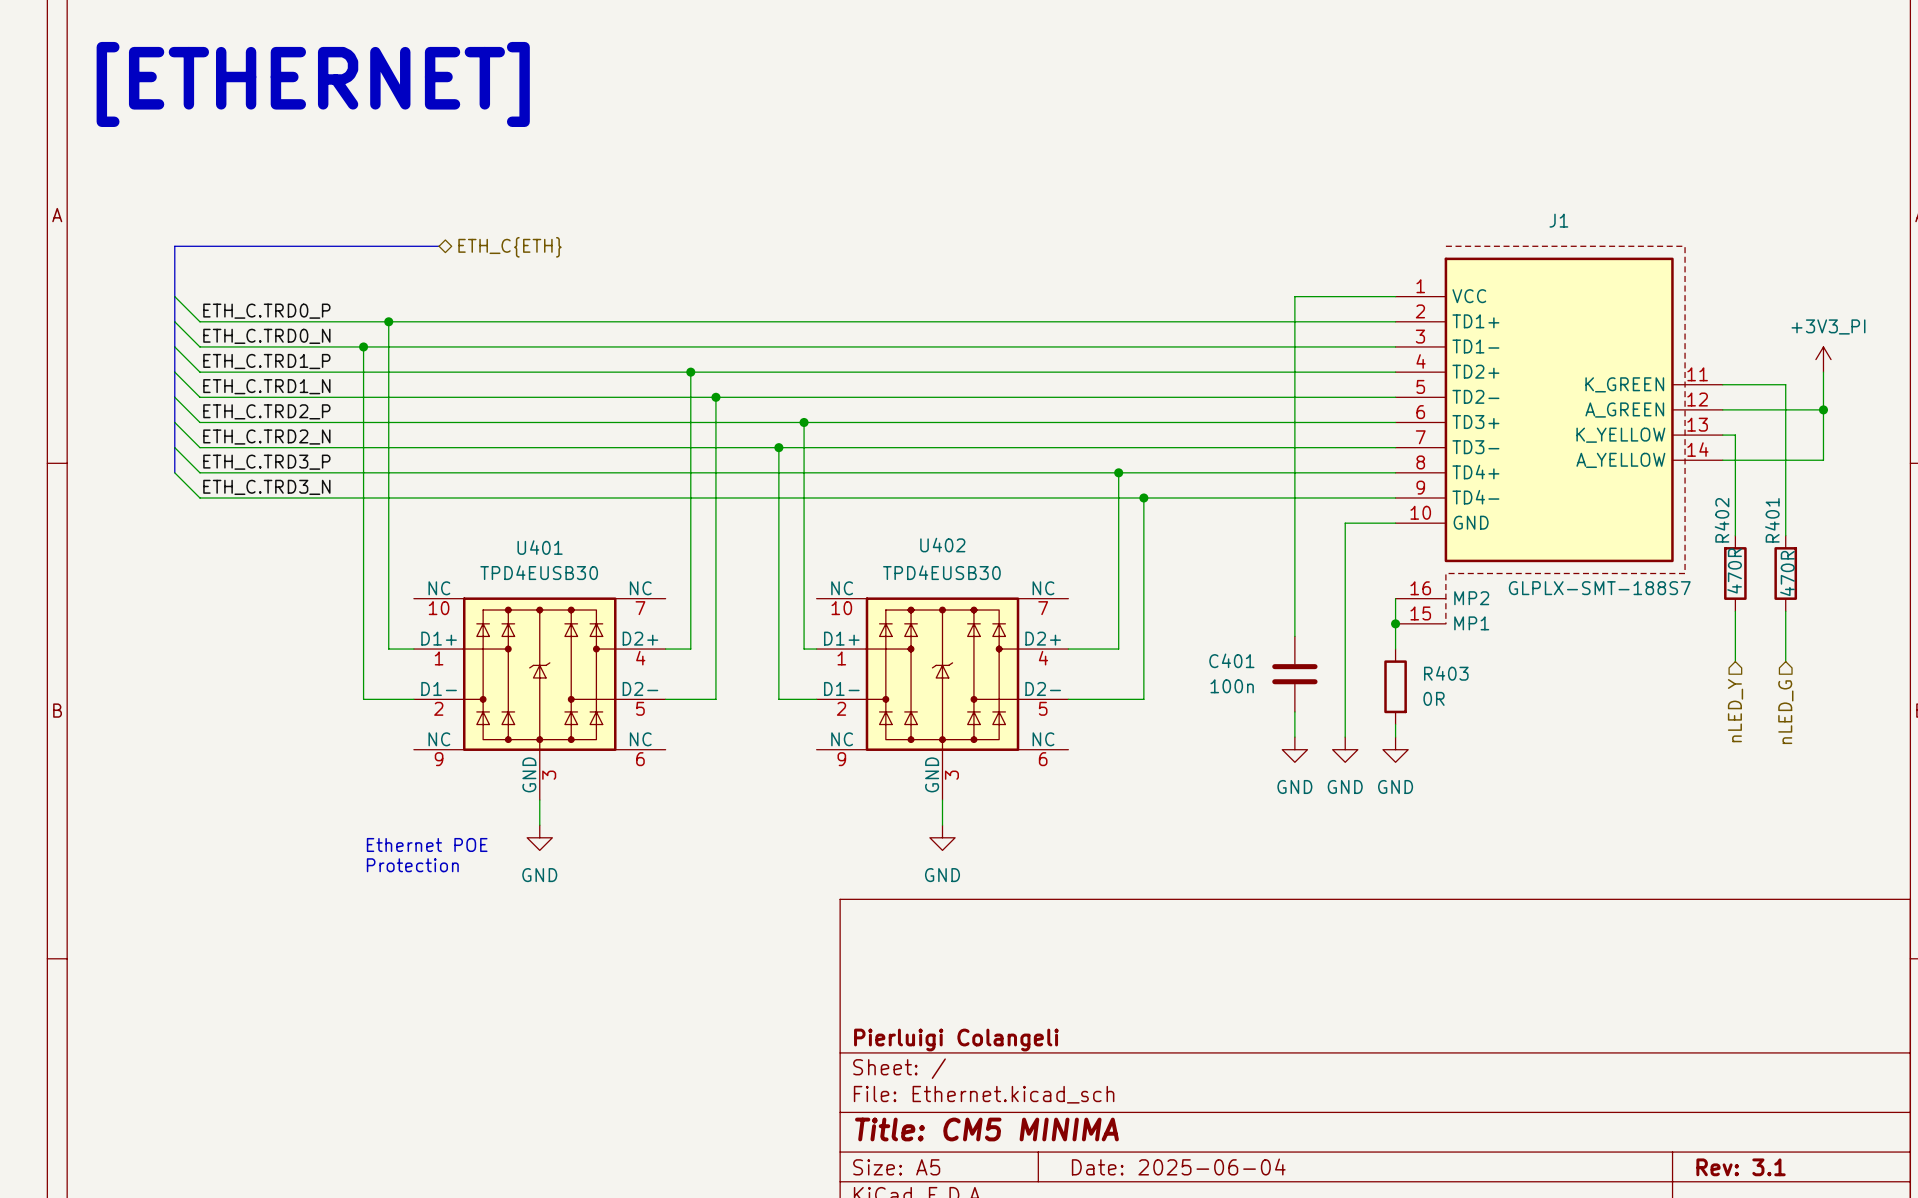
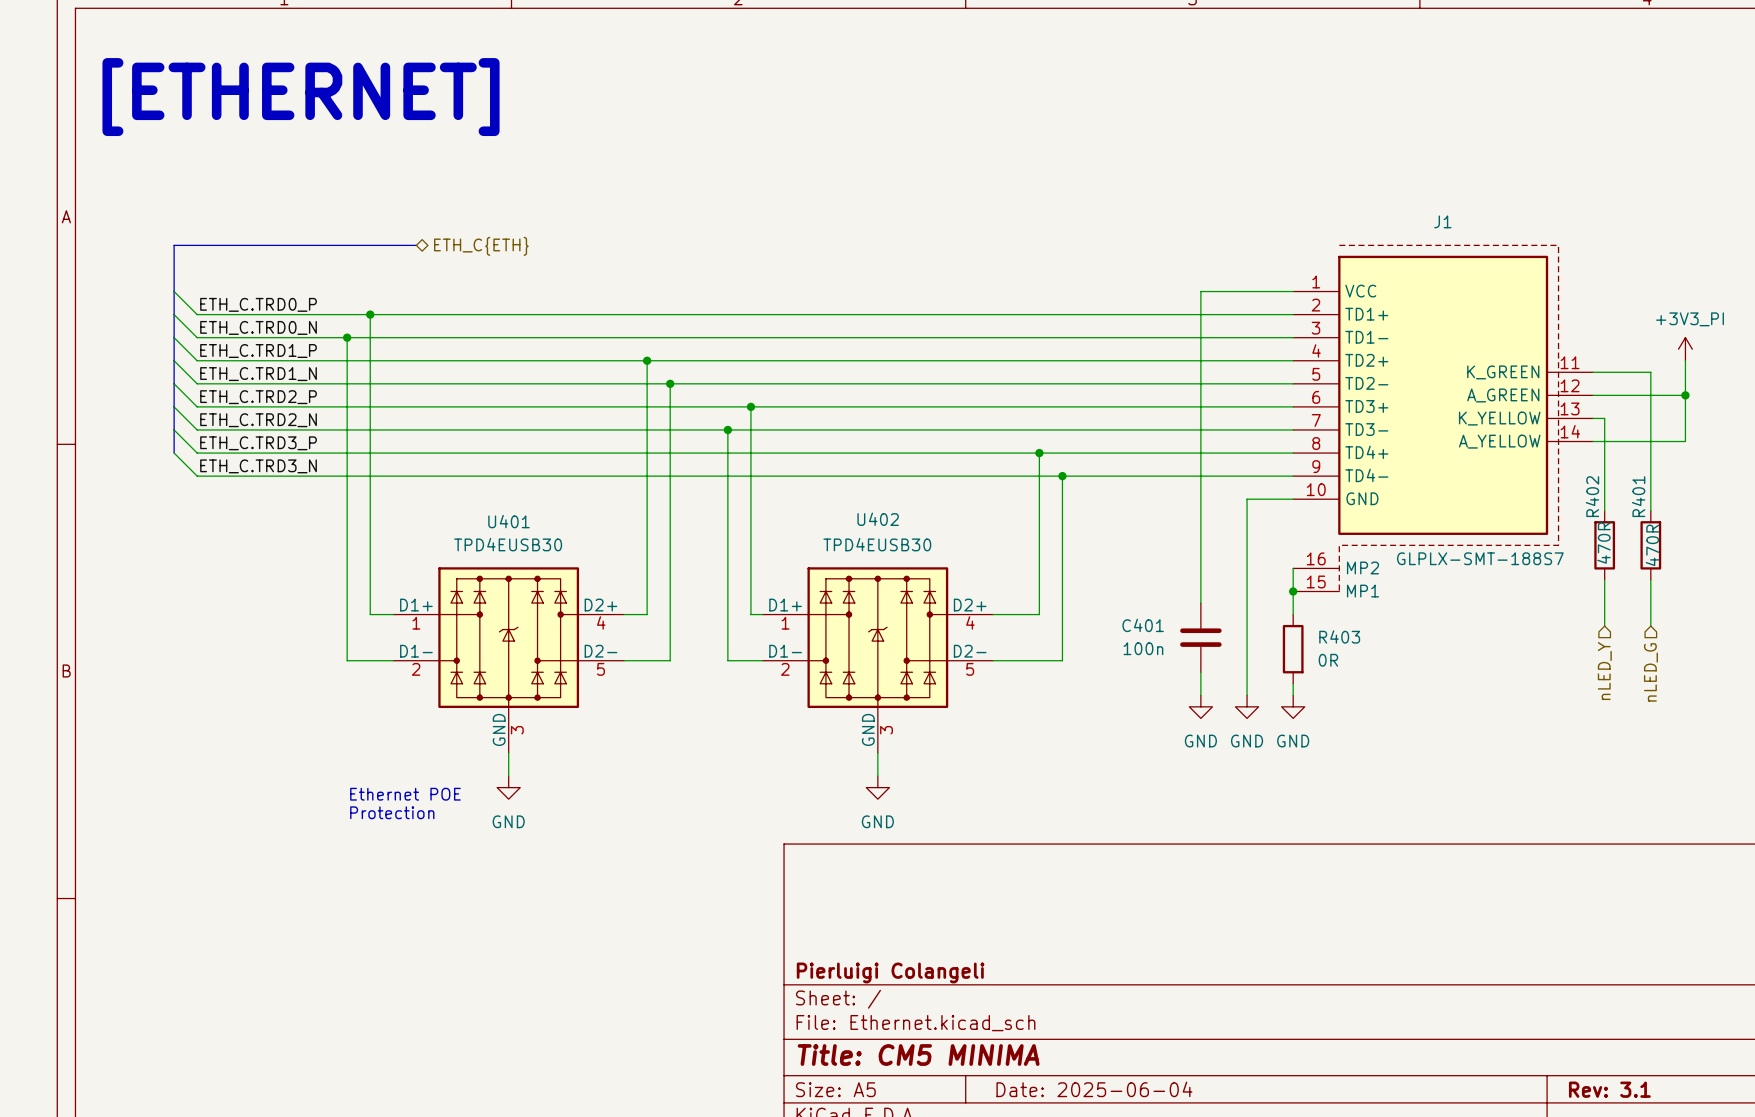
U401 symbol: [413, 597, 666, 801] -> [393, 567, 625, 754]
U402 symbol: [816, 597, 1069, 801] -> [762, 567, 994, 754]

